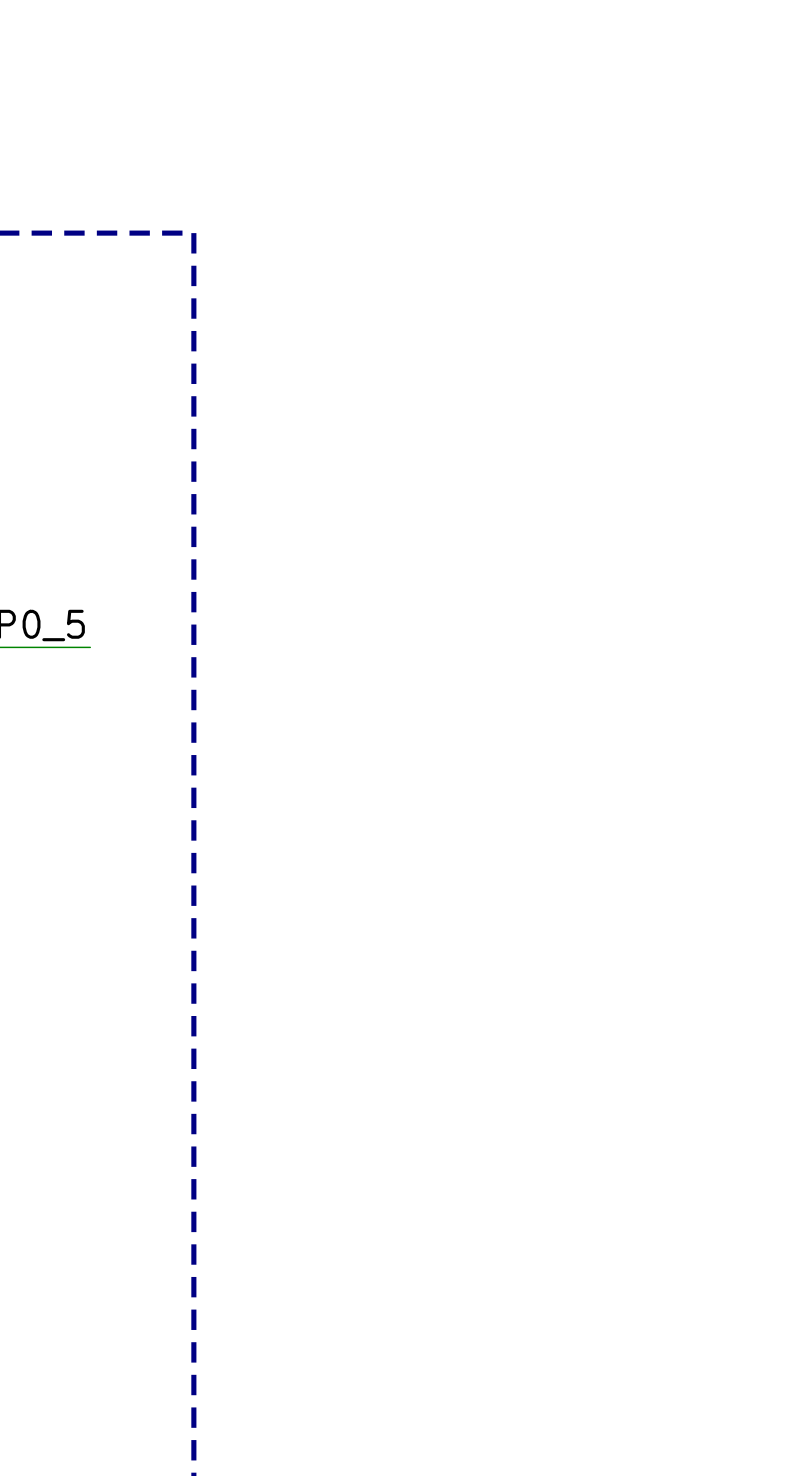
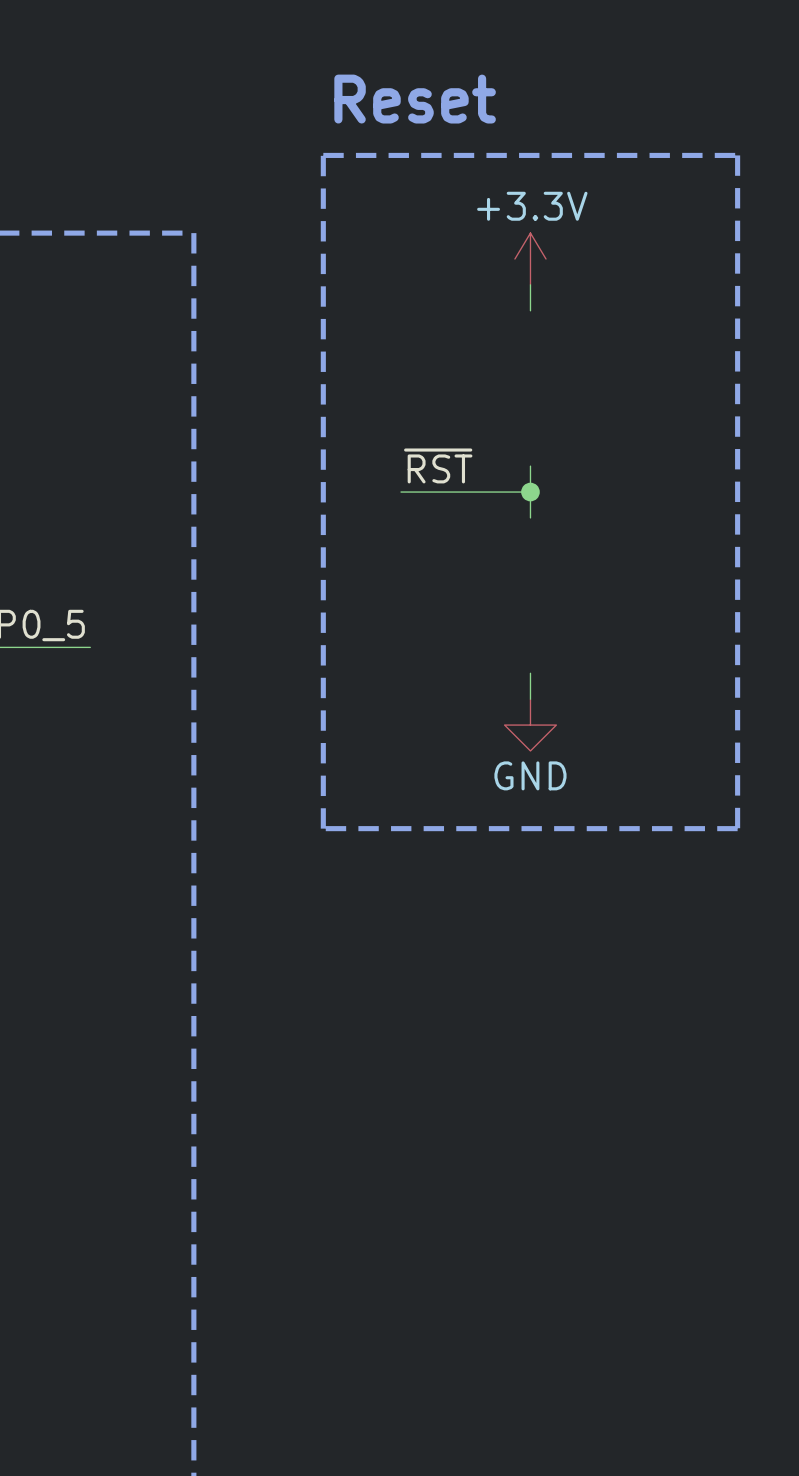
text: none -> Reset (415, 99)
line: none -> (323, 155) (737, 155) (737, 828) (323, 828) (323, 155)
power symbol: none -> +3.3V (530, 259)
wire: none -> (530, 284) (530, 310)
label: none -> ~{RST} (438, 465)
wire: none -> (530, 466) (530, 517)
wire: none -> (401, 492) (530, 492)
junction: none -> (530, 492)
wire: none -> (530, 673) (530, 699)
power symbol: none -> GND (530, 725)

